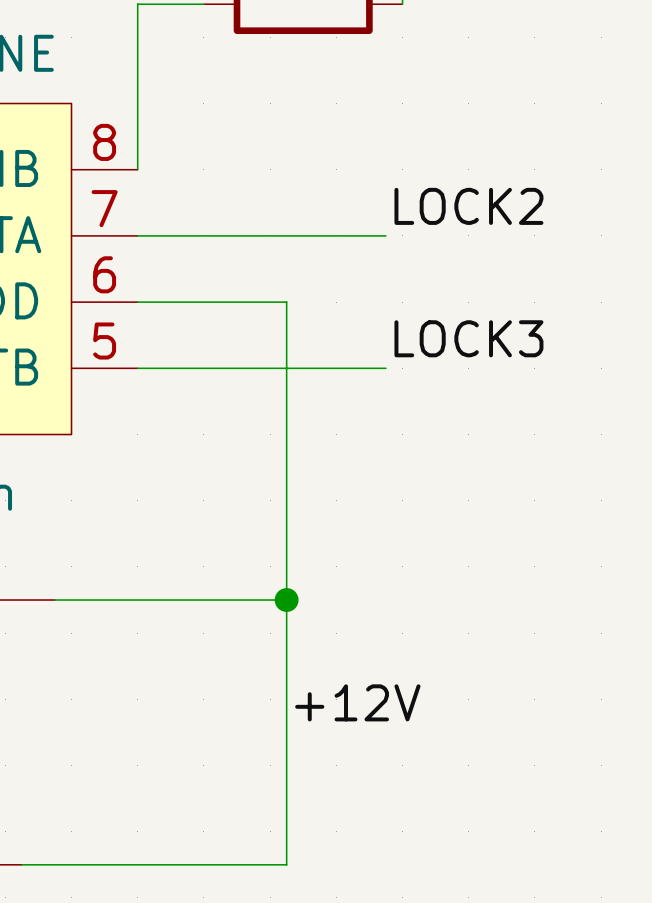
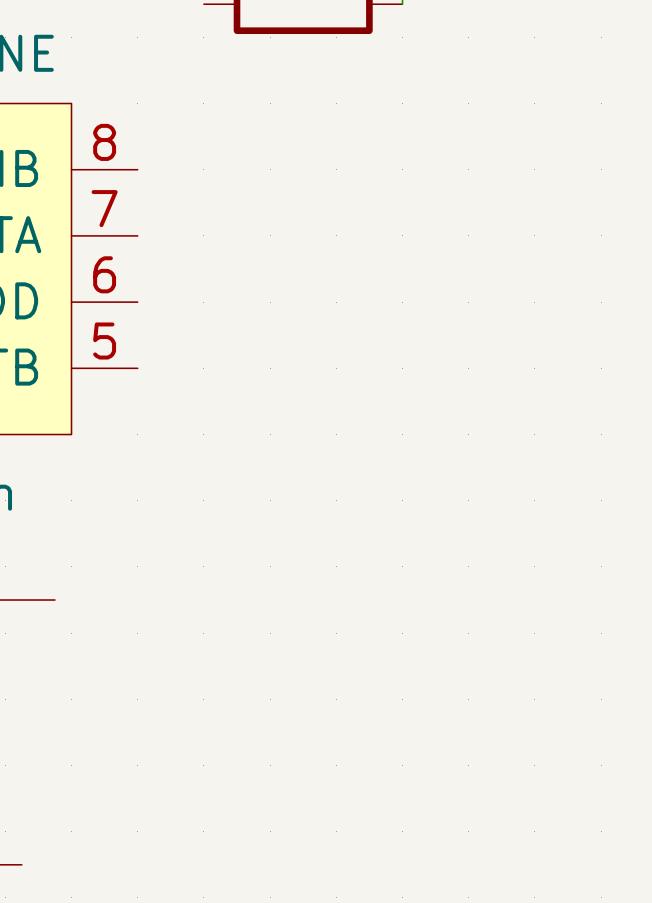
wire: (203, 4) (137, 4) (137, 169) -> none
label: LOCK2 (468, 206) -> none
wire: (137, 235) (385, 235) -> none
wire: (137, 302) (286, 302) (286, 864) (21, 864) -> none
label: LOCK3 (468, 338) -> none
wire: (137, 368) (385, 368) -> none
wire: (54, 600) (286, 600) -> none
junction: (286, 600) -> none
label: +12V (357, 702) -> none

